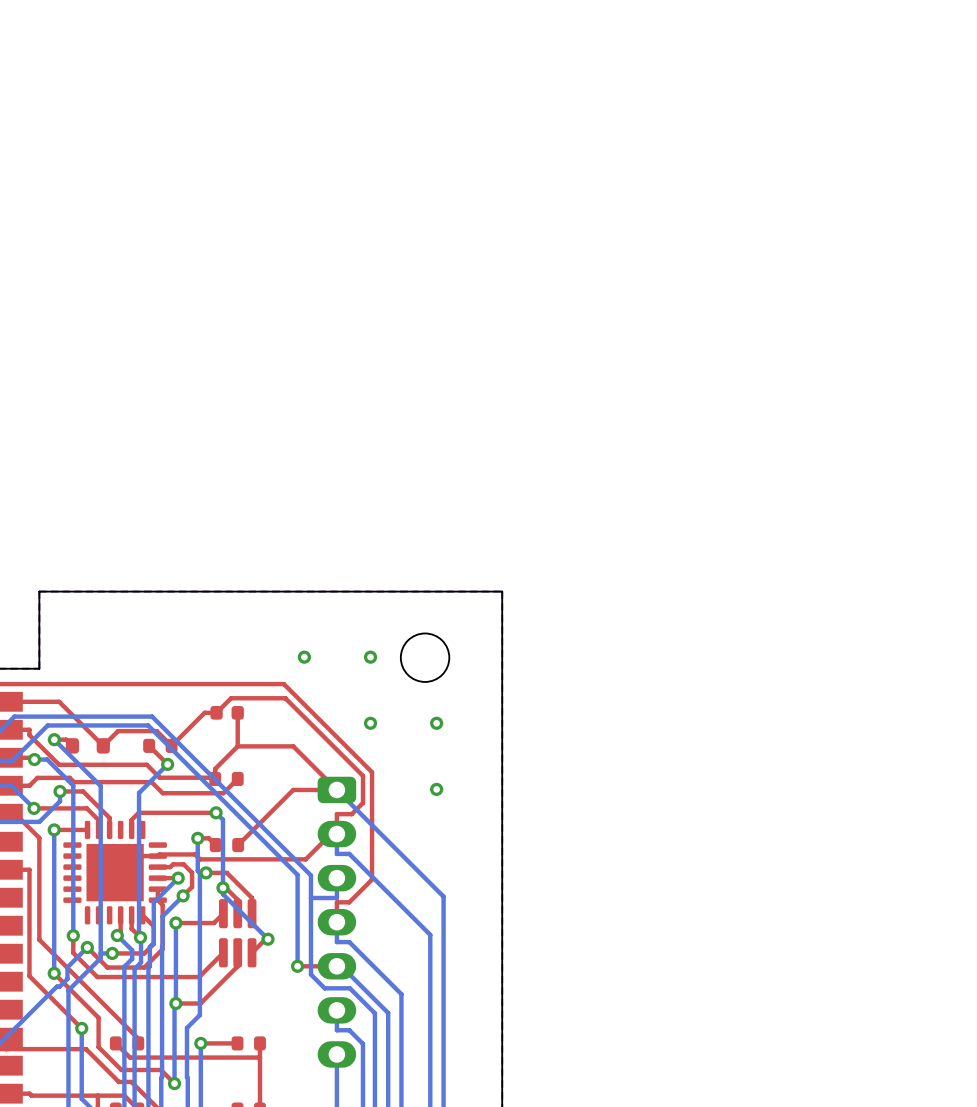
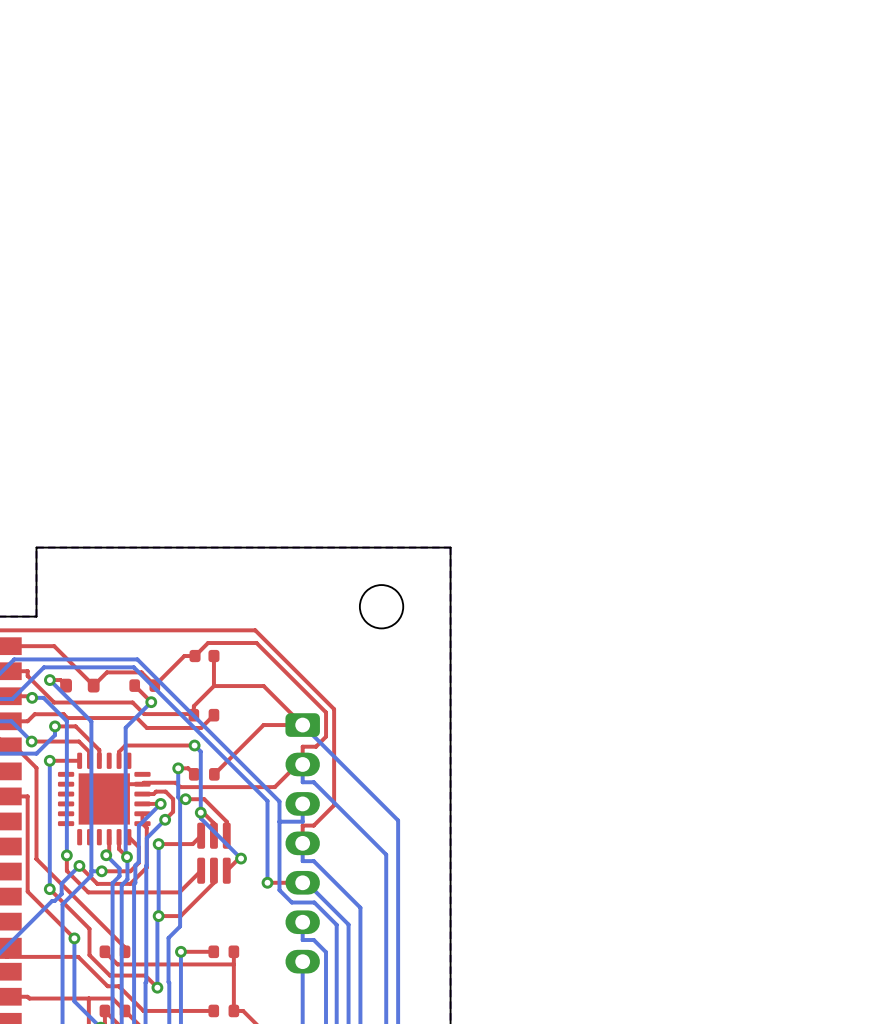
via: (304, 657) -> none
via: (370, 657) -> none
via: (370, 723) -> none
via: (436, 723) -> none
via: (436, 789) -> none

